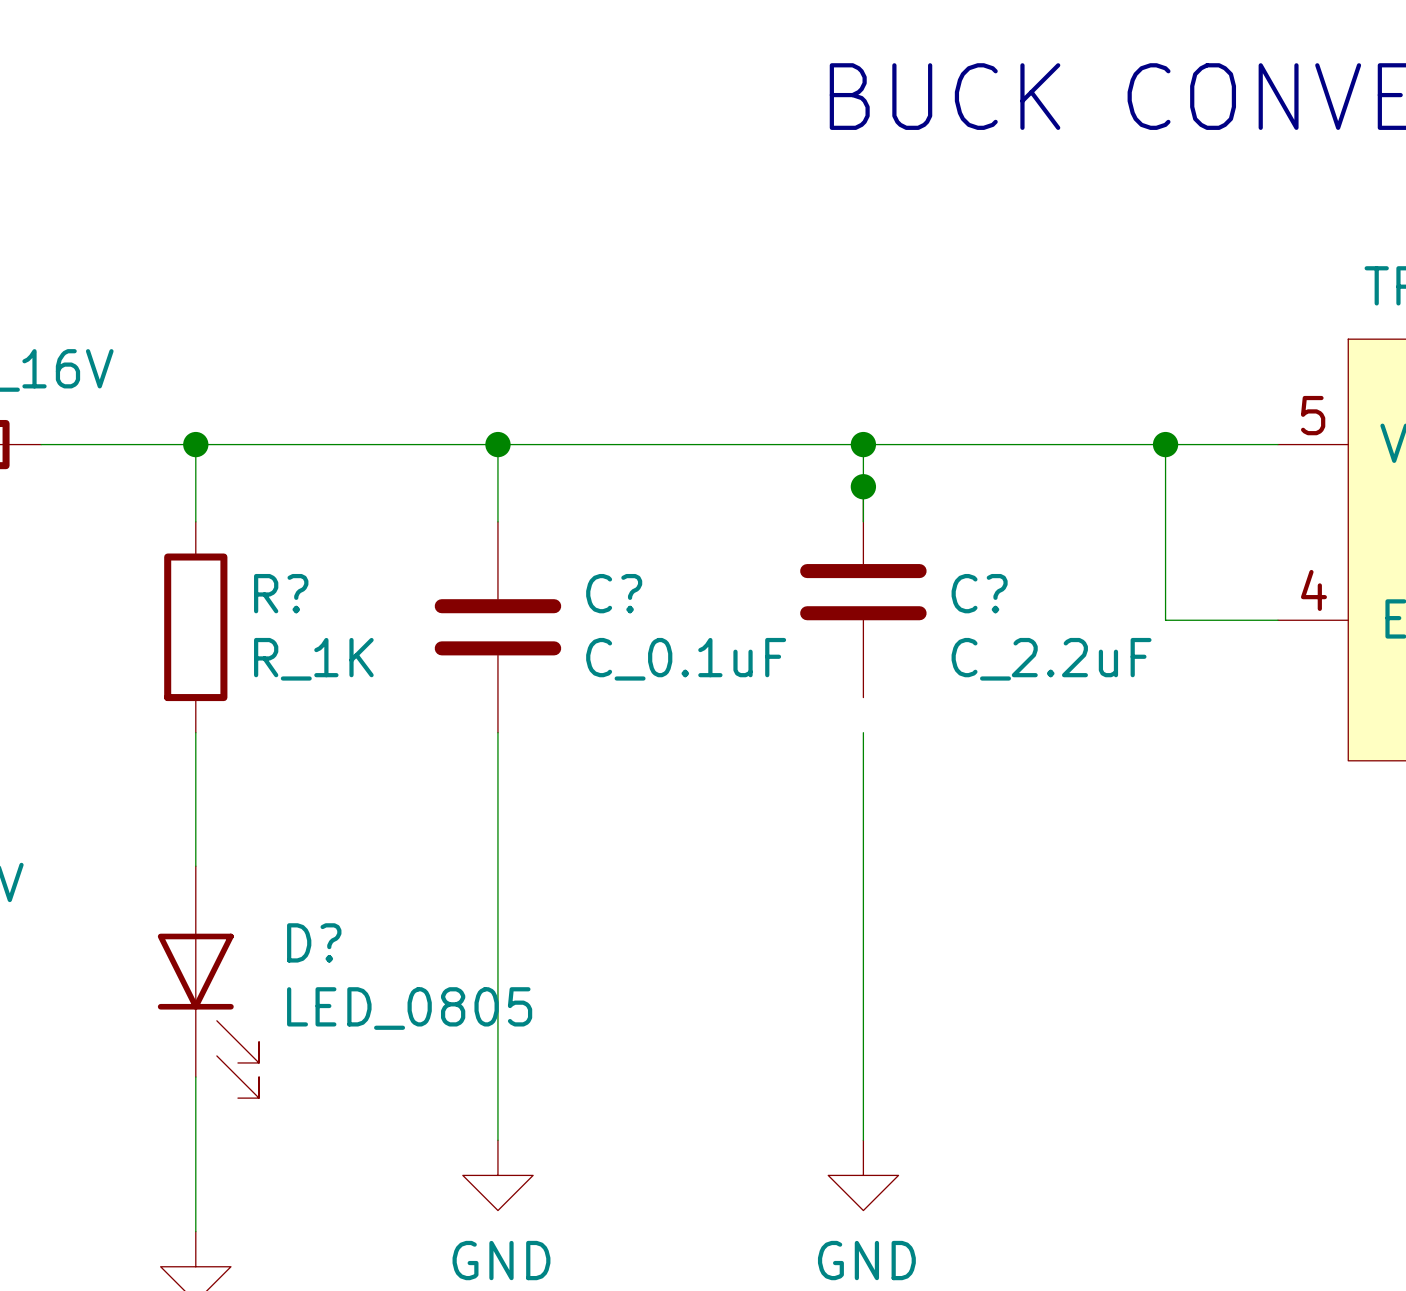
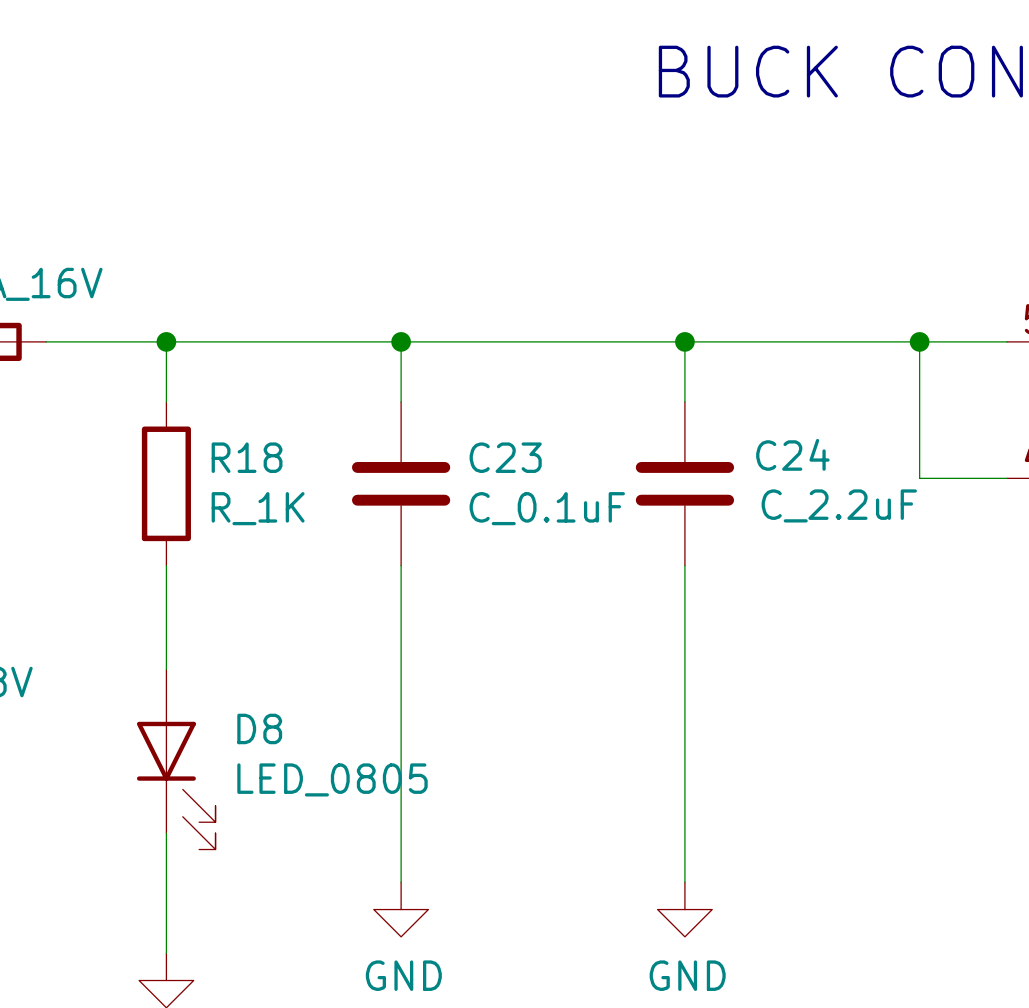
junction: (863, 486) -> none
C?: C_2.2uF (863, 592) -> none
R? name: R? (281, 593) -> R18 (247, 457)
C? name: C? (614, 593) -> C23 (505, 457)
C24: none -> C_2.2uF (684, 483)
D? name: D? (314, 942) -> D8 (259, 728)

